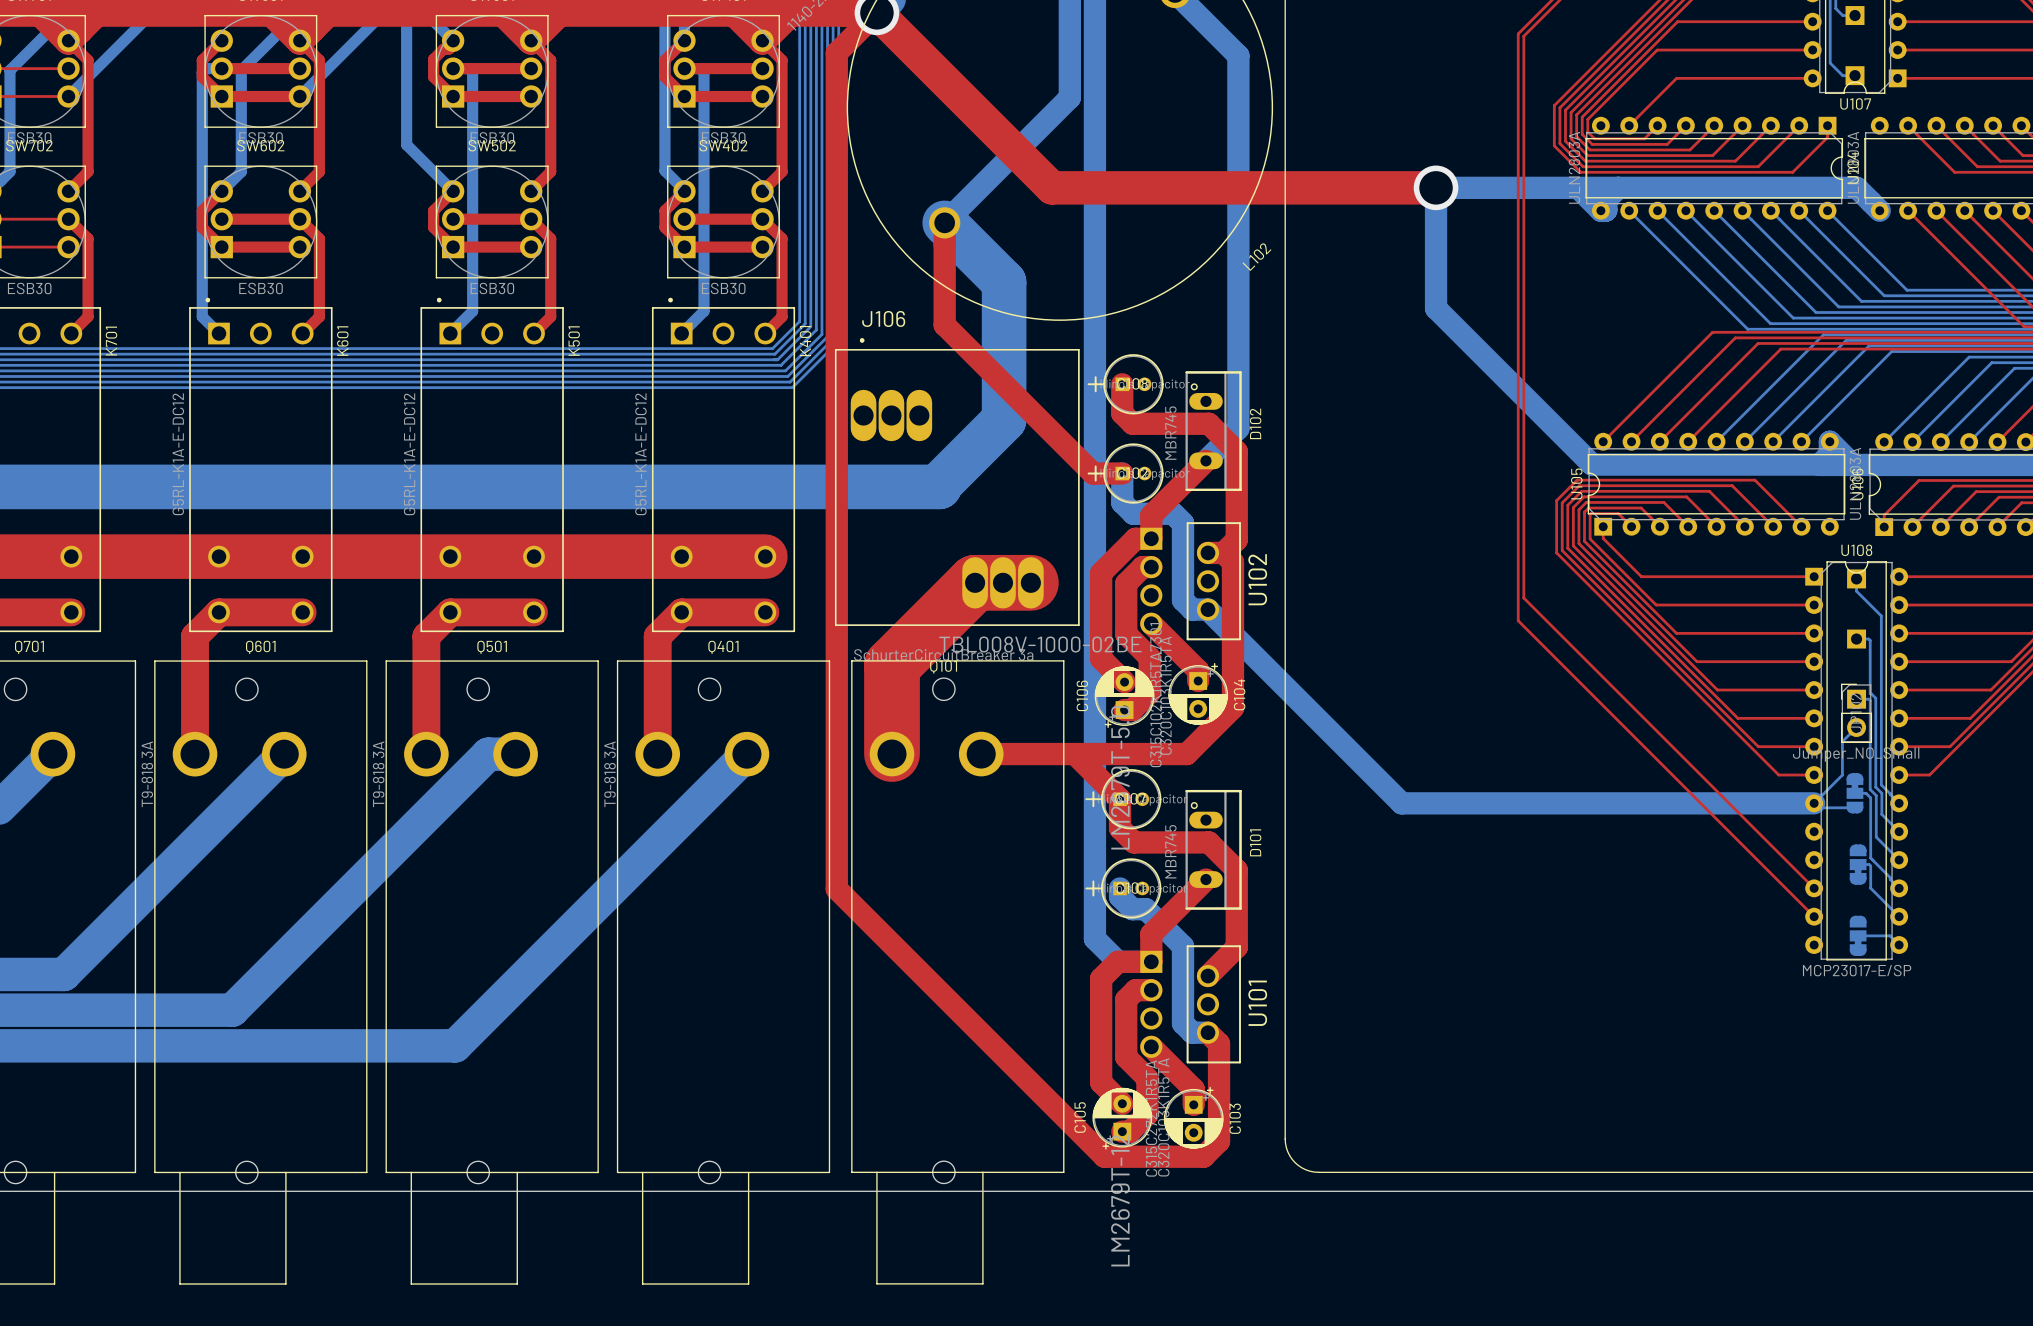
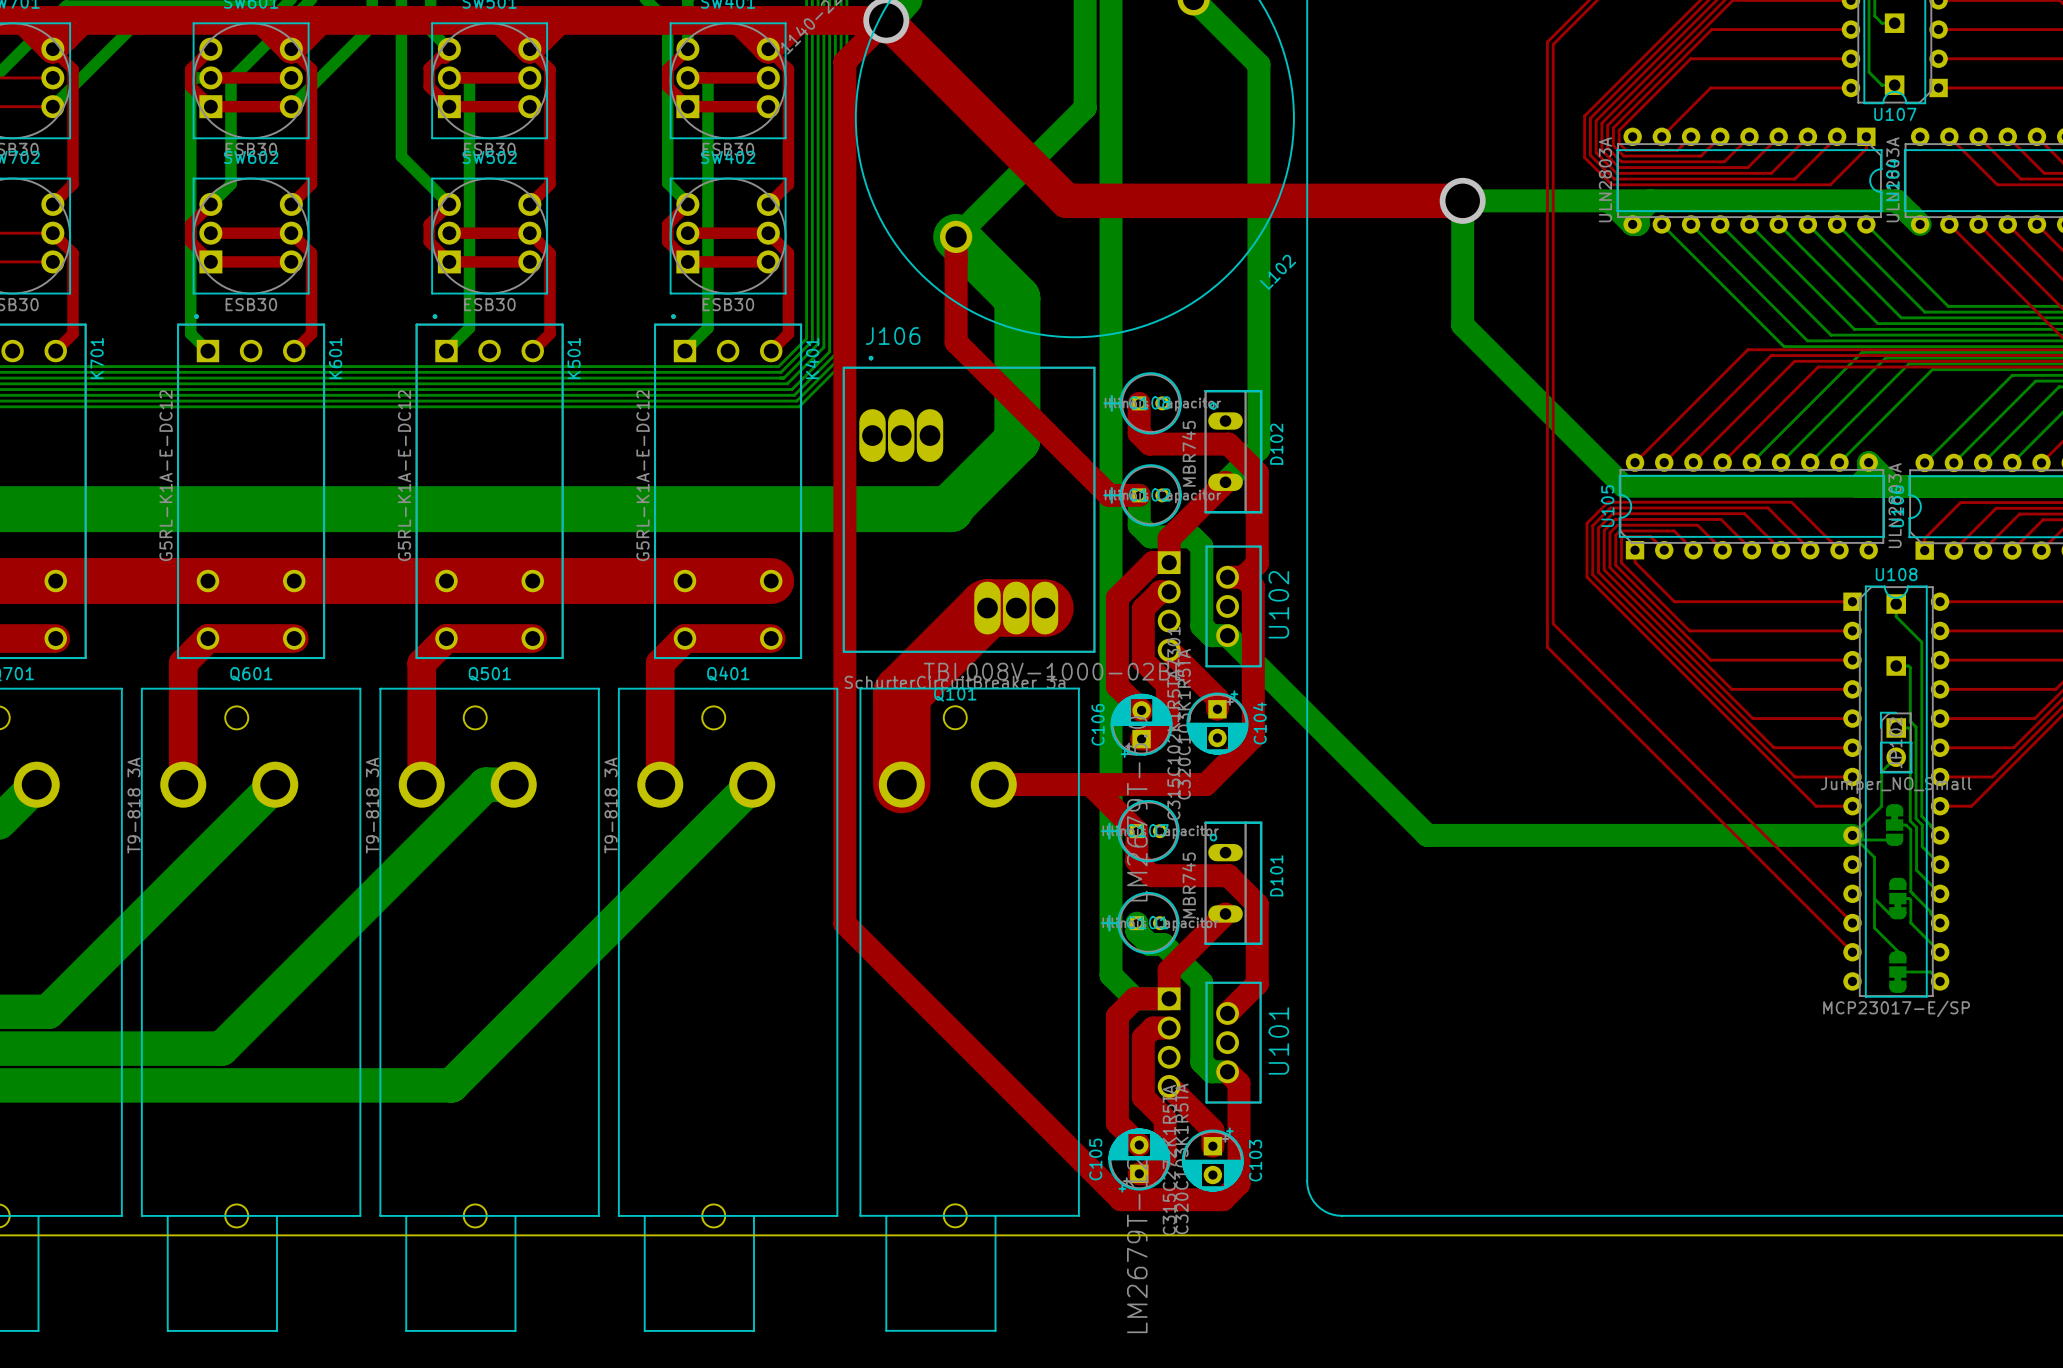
bottom track: none -> (1857, 840) (1874, 857) (1874, 927) (1897, 951) (1897, 957)
bottom track: none -> (1874, 898) (1889, 913) (1897, 913)

